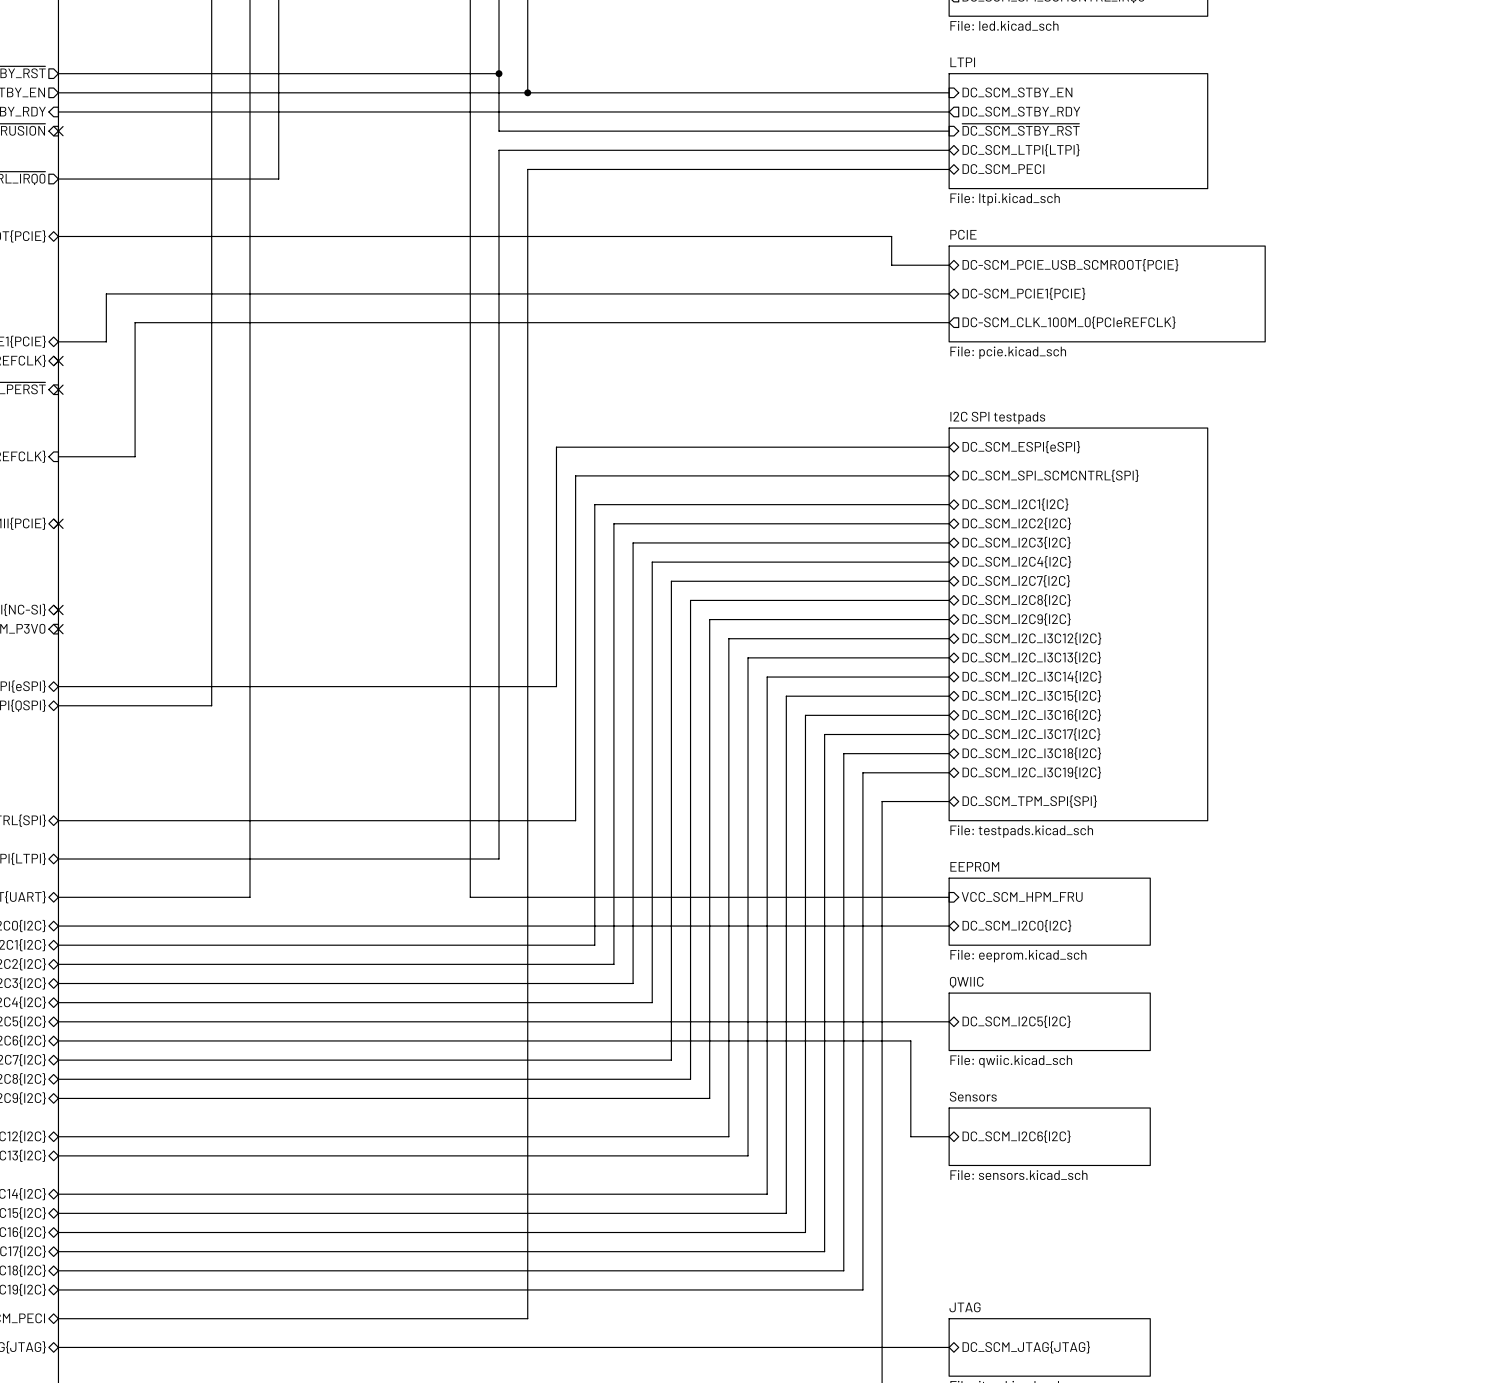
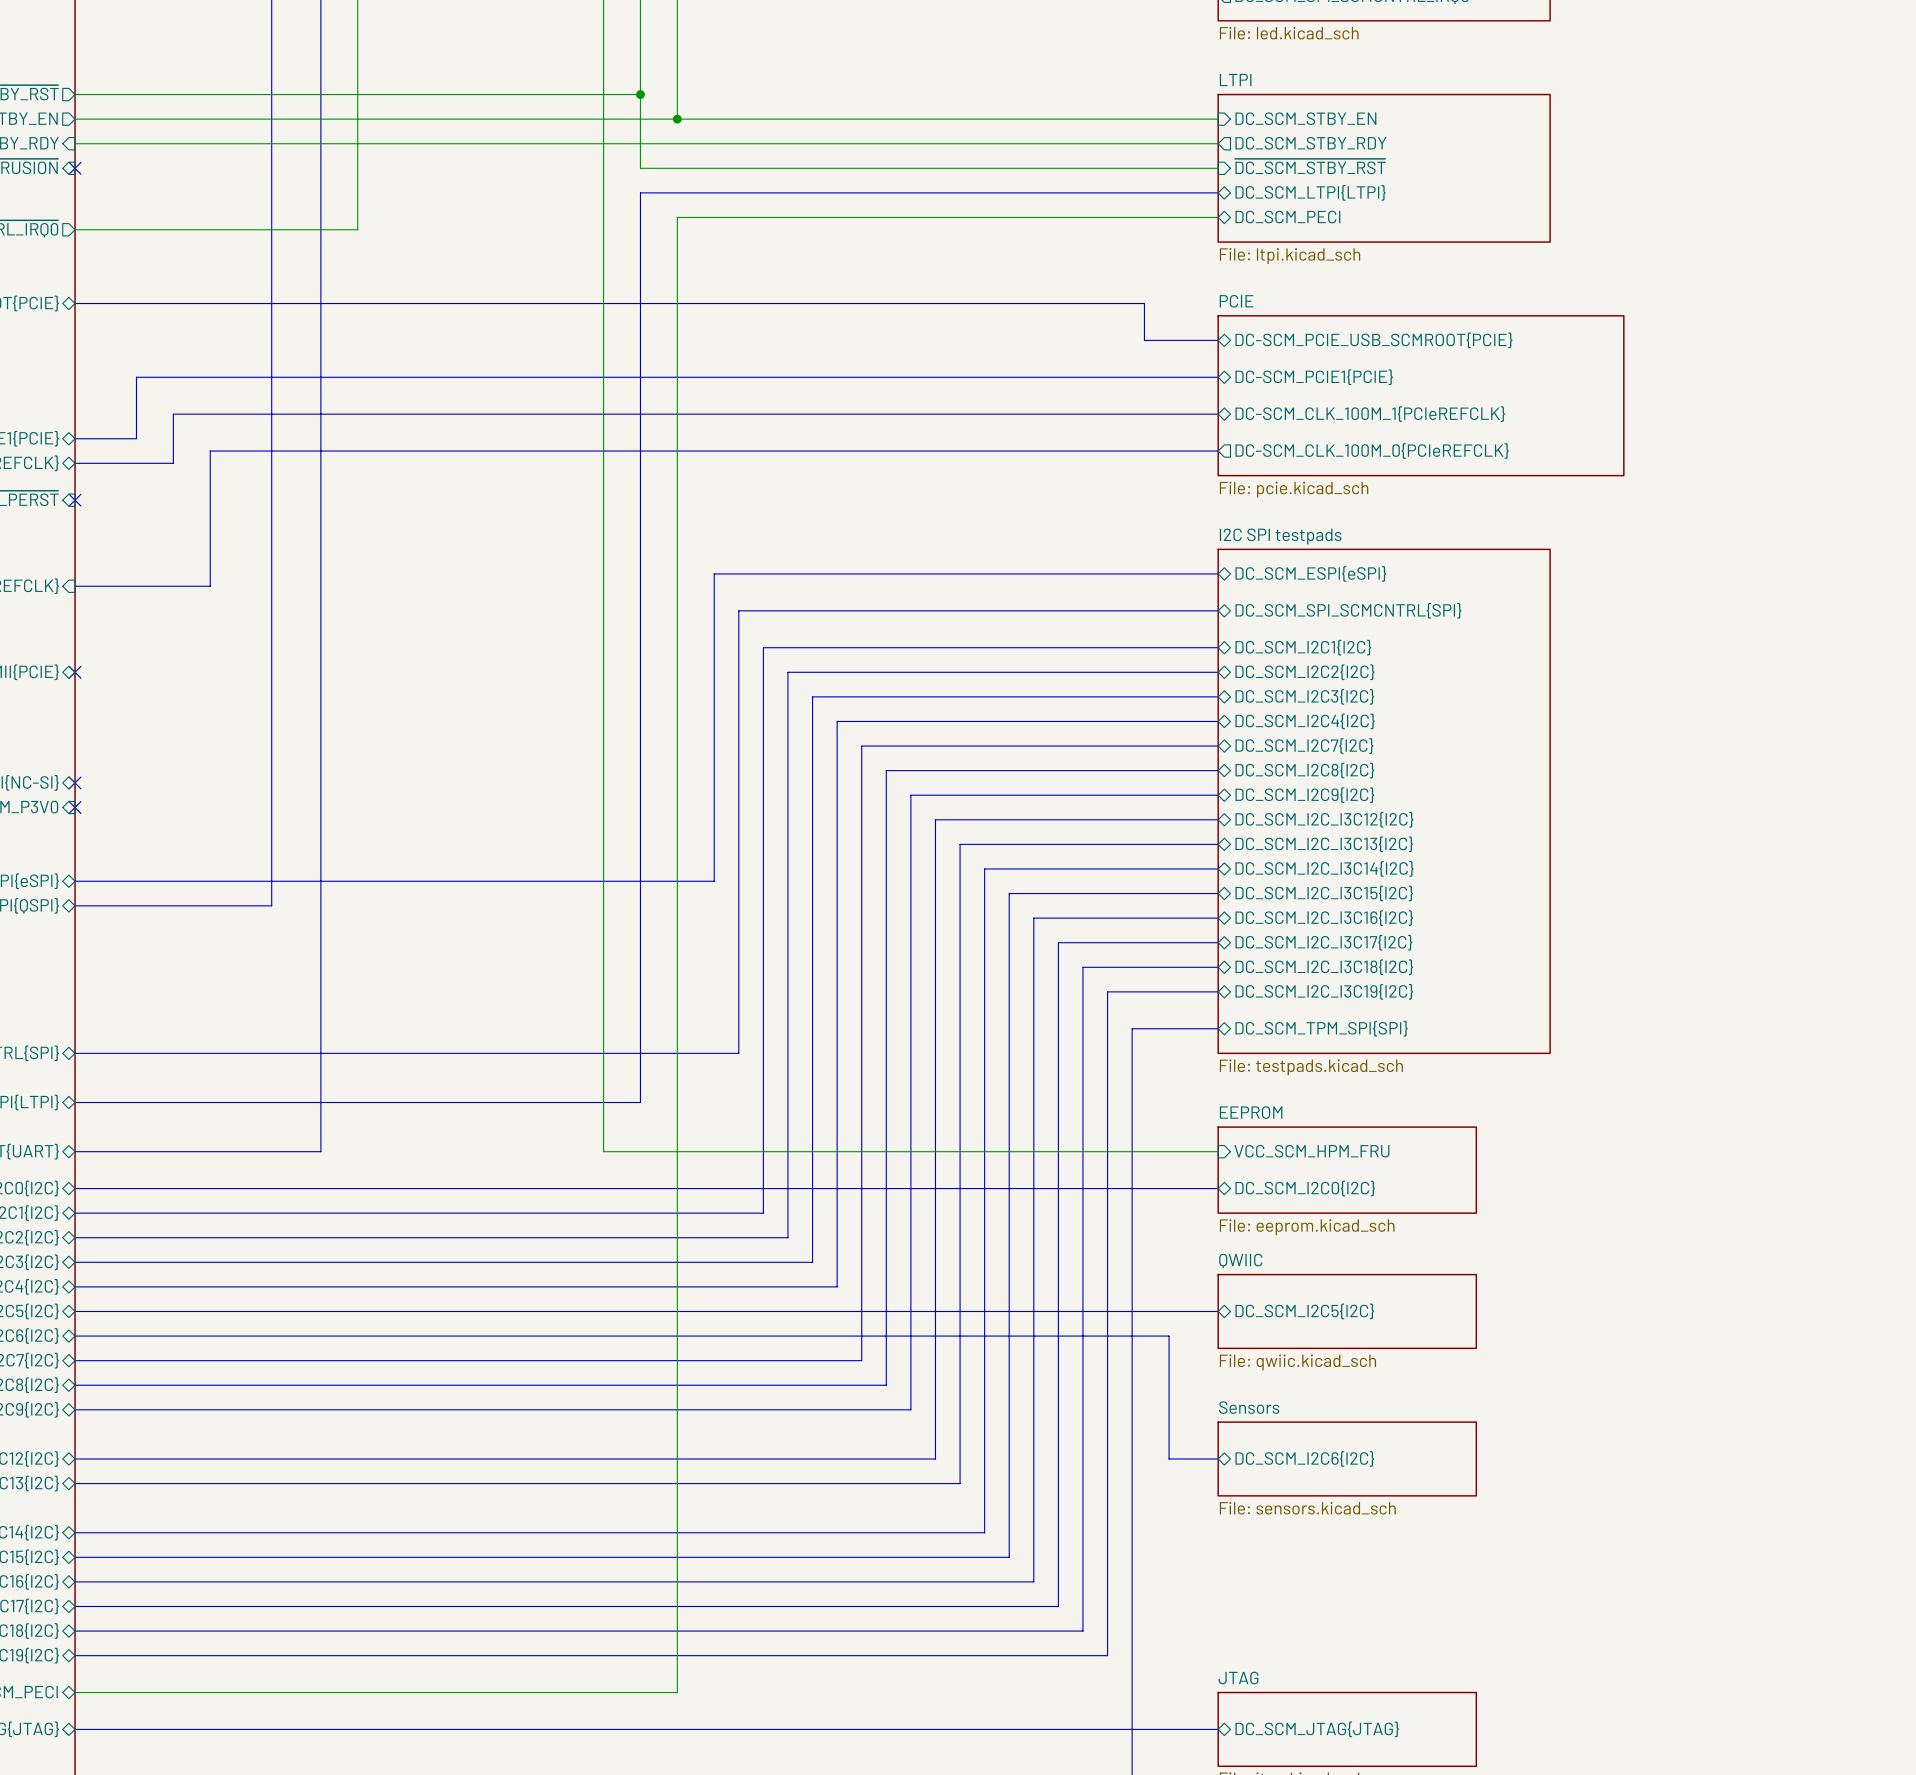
sheet PCIE: File: pcie.kicad_sch (1107, 293) -> none
sheet PCIE: none -> File: pcie.kicad_sch (1421, 395)
sheet pin shape: output (1069, 322) -> bidirectional (1370, 414)
sheet pin: DC-SCM_CLK_100M_0{PCIeREFCLK} (1069, 322) -> DC-SCM_CLK_100M_1{PCIeREFCLK} (1370, 414)
bus: none -> (1218, 451) (210, 451) (210, 586) (173, 586)
sheet pin: none -> DC-SCM_CLK_100M_0{PCIeREFCLK} (1372, 450)
no-connect mark: (58, 360) -> none
bus: (135, 360) (135, 456) -> (173, 463) (75, 463)

